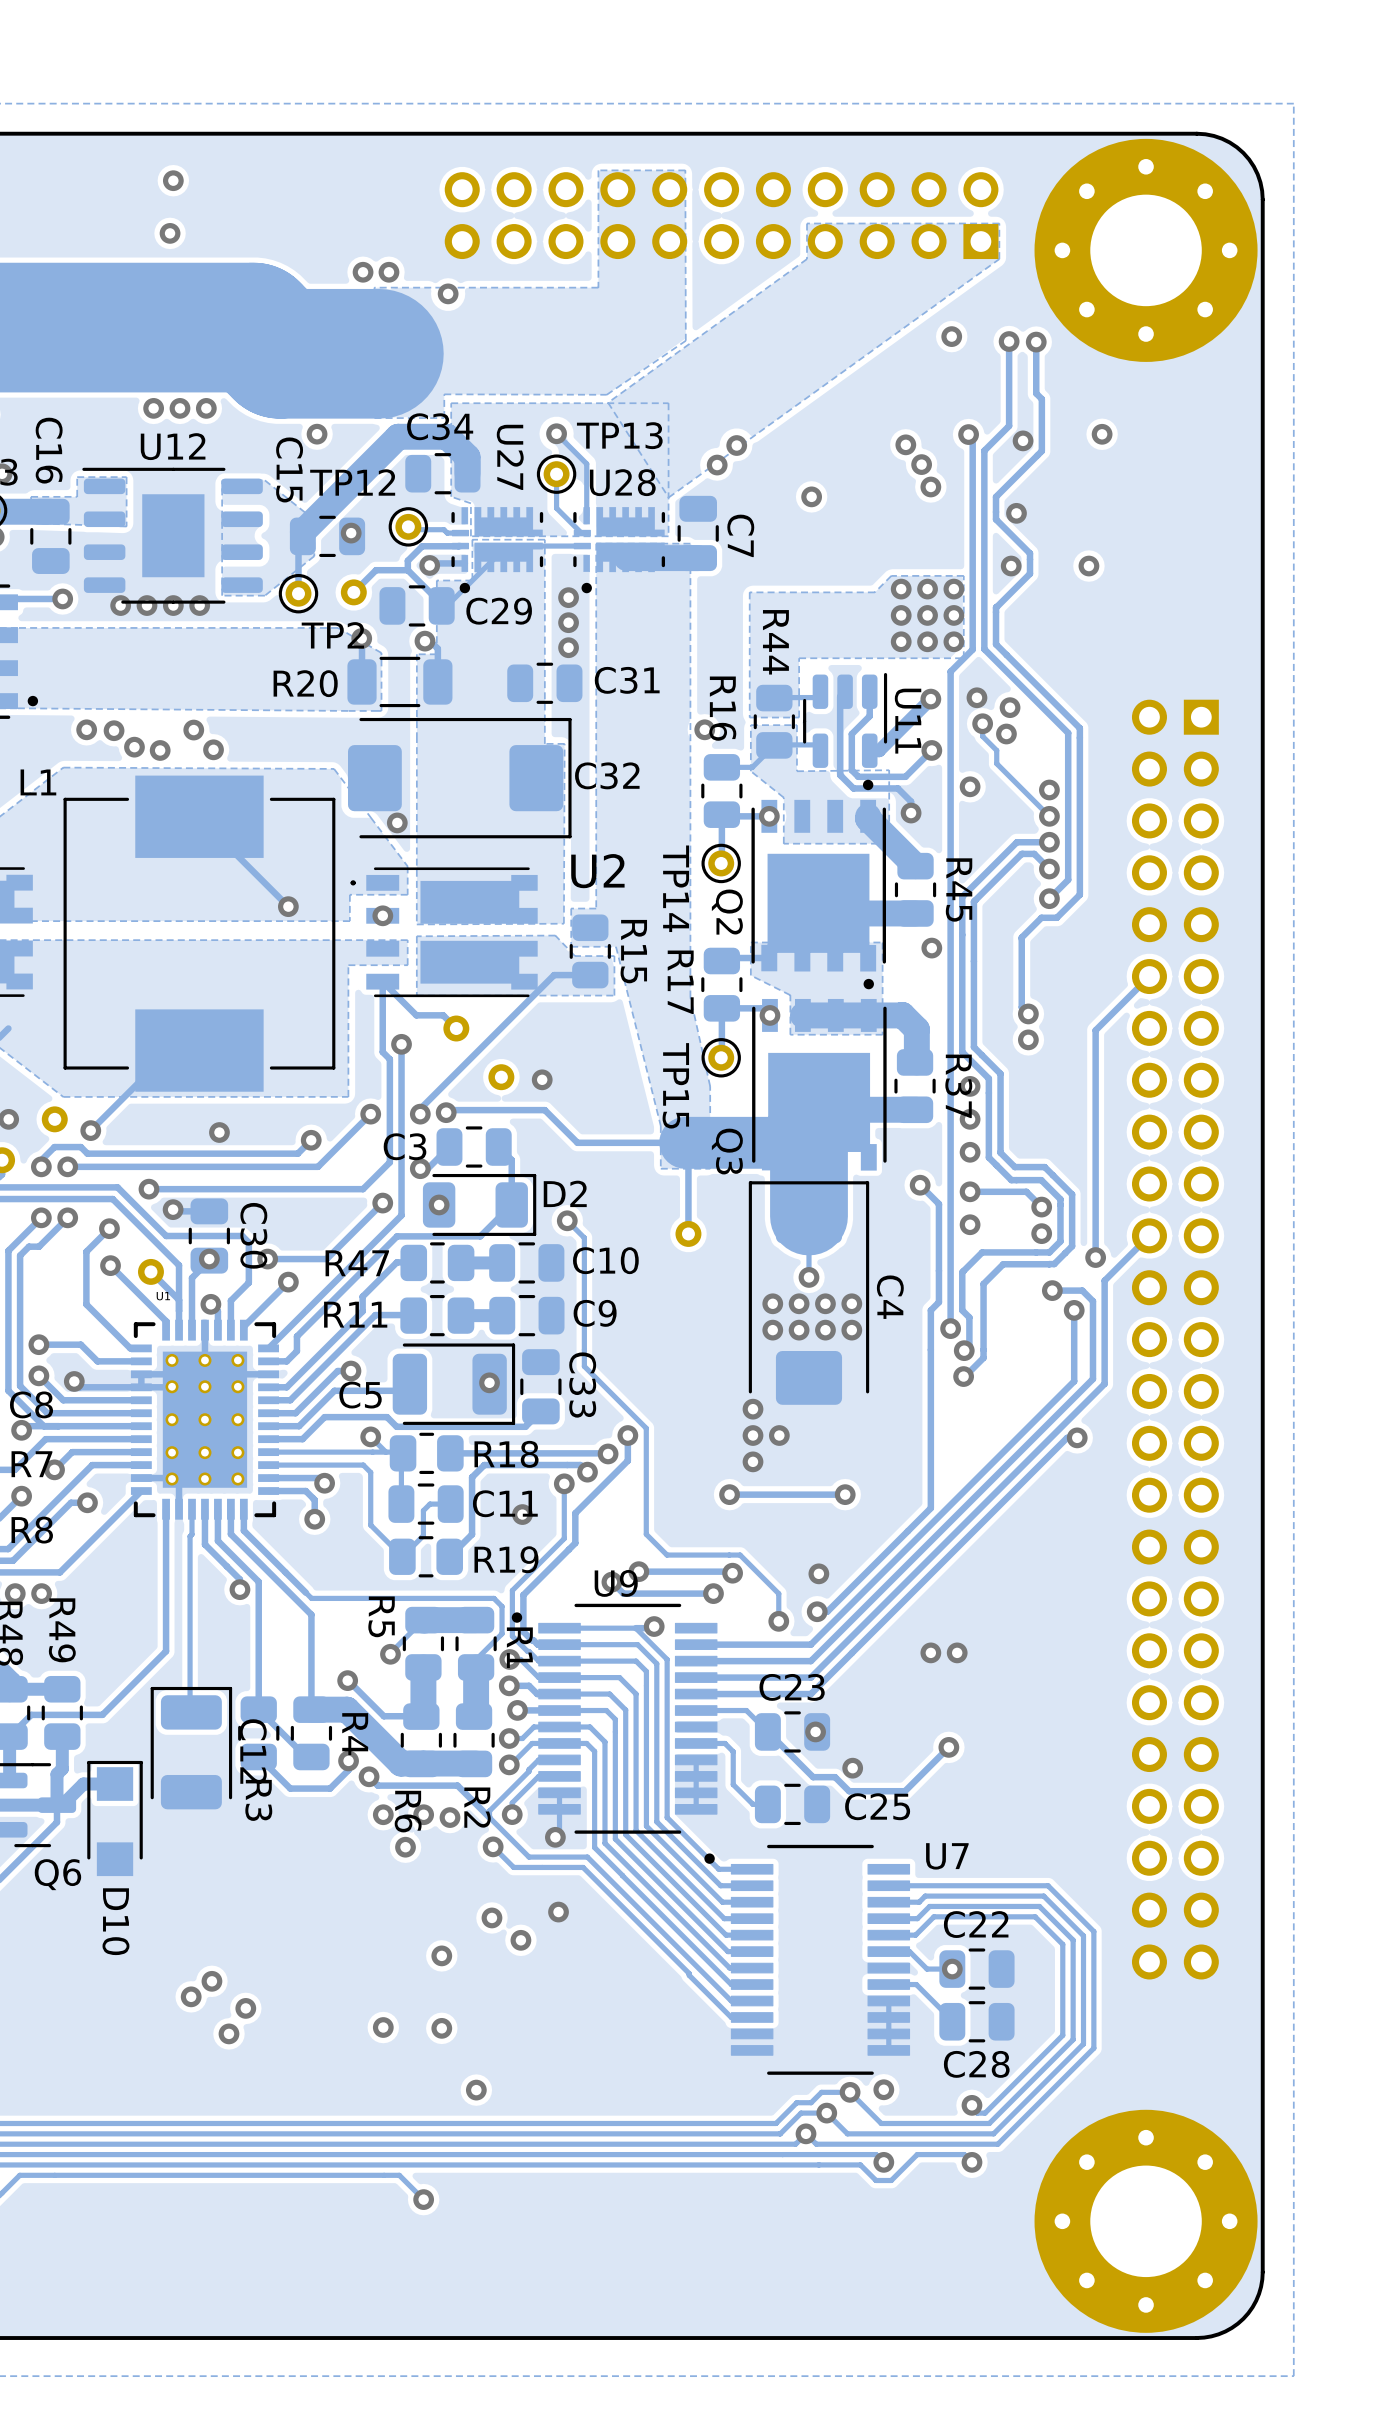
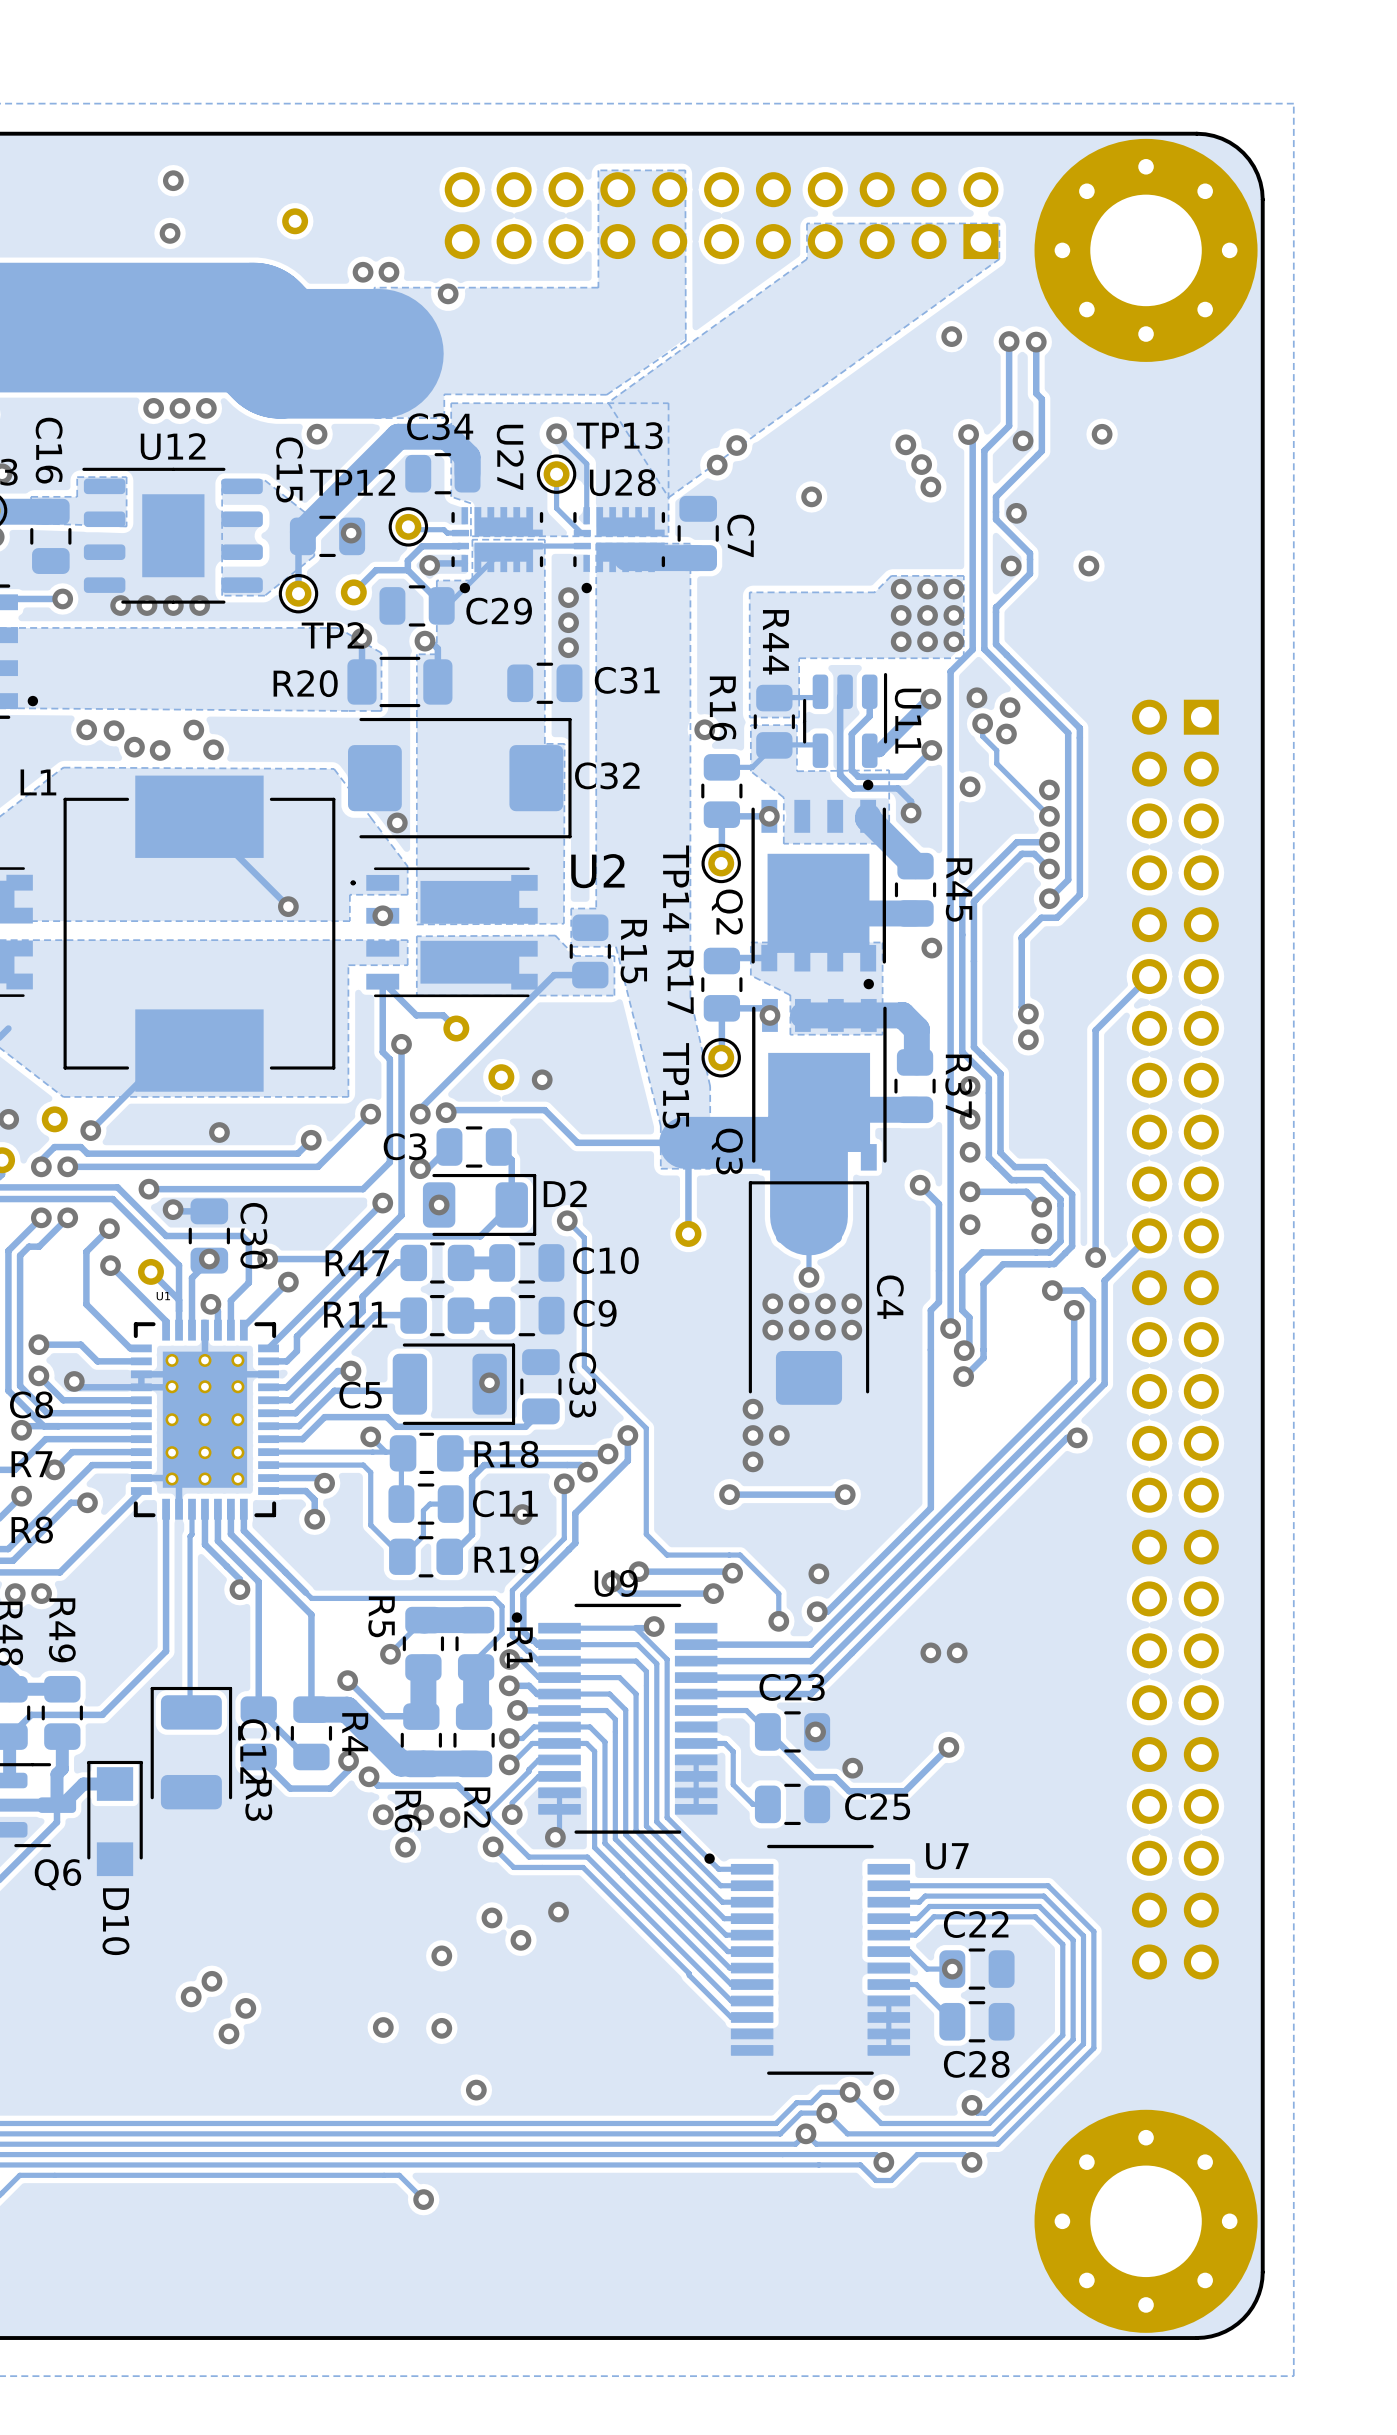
part: none -> (295, 221)

